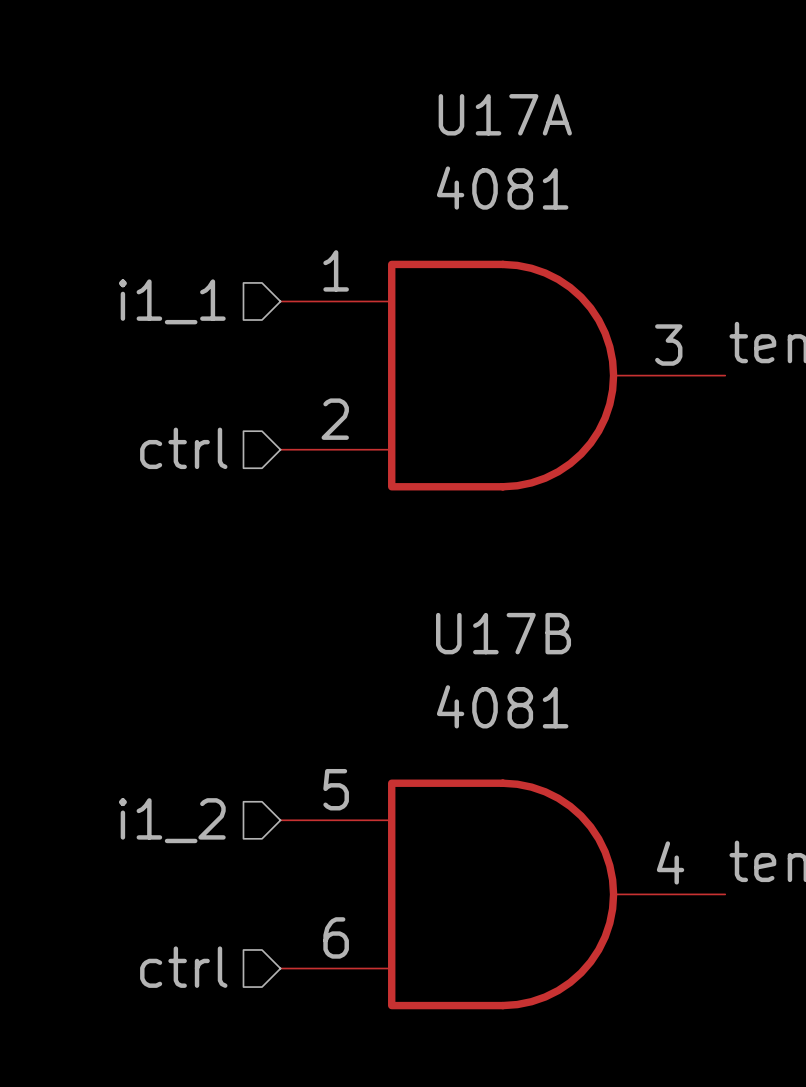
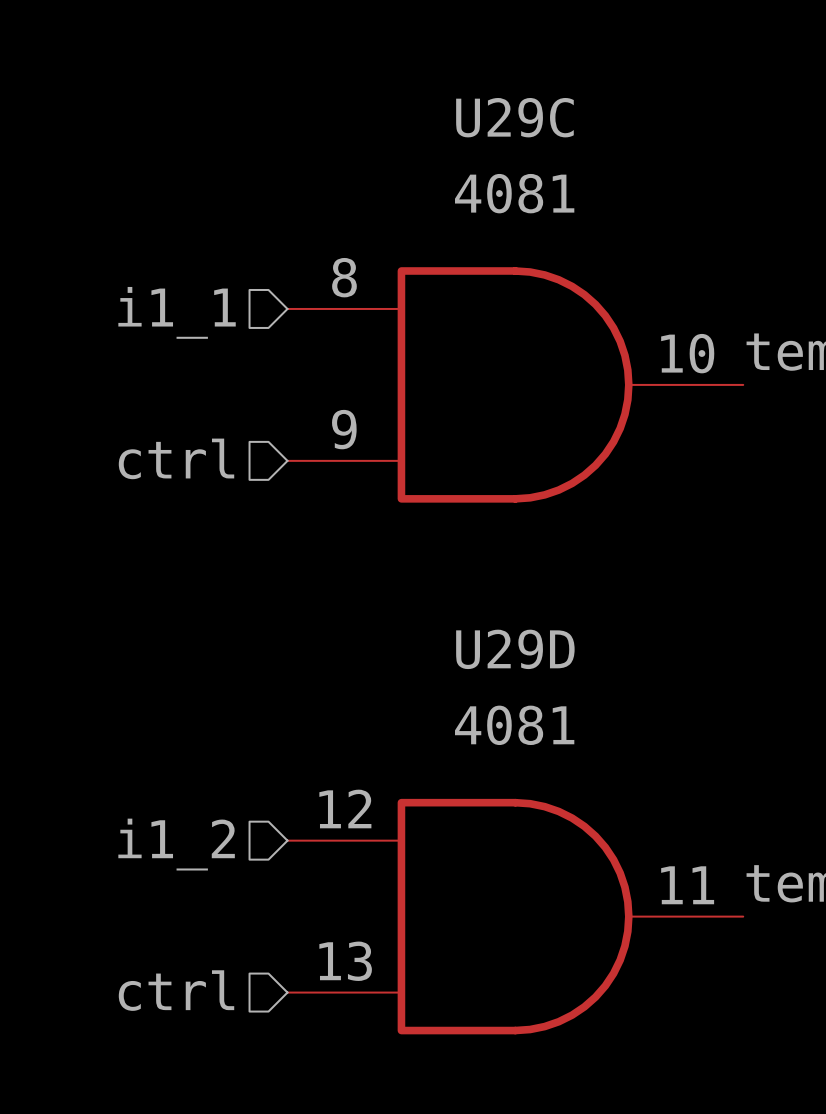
U17A name: U17A (505, 114) -> U29C (514, 117)
U17A pin number: 1 (336, 270) -> 8 (344, 277)
U17A pin number: 3 (668, 345) -> 10 (687, 353)
U17A pin number: 2 (335, 419) -> 9 (344, 429)
U17B name: U17B (503, 633) -> U29D (515, 649)
U17B pin number: 5 (336, 789) -> 12 (345, 808)
U17B pin number: 4 (670, 862) -> 11 (687, 885)
U17B pin number: 6 (336, 937) -> 13 (345, 961)

